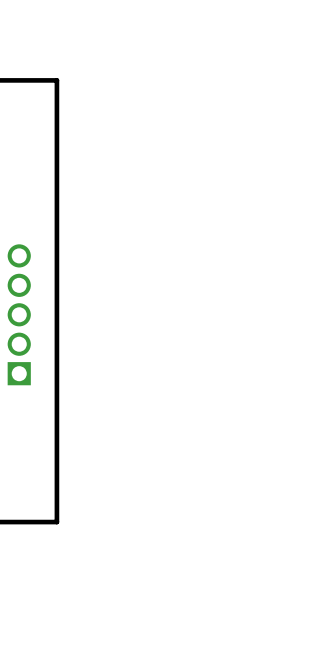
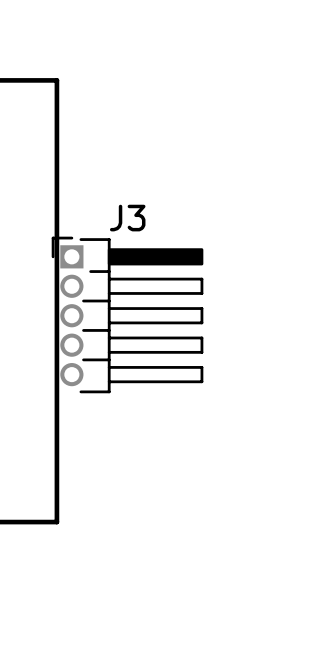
J3 side: bottom (19, 314) -> top (127, 314)

